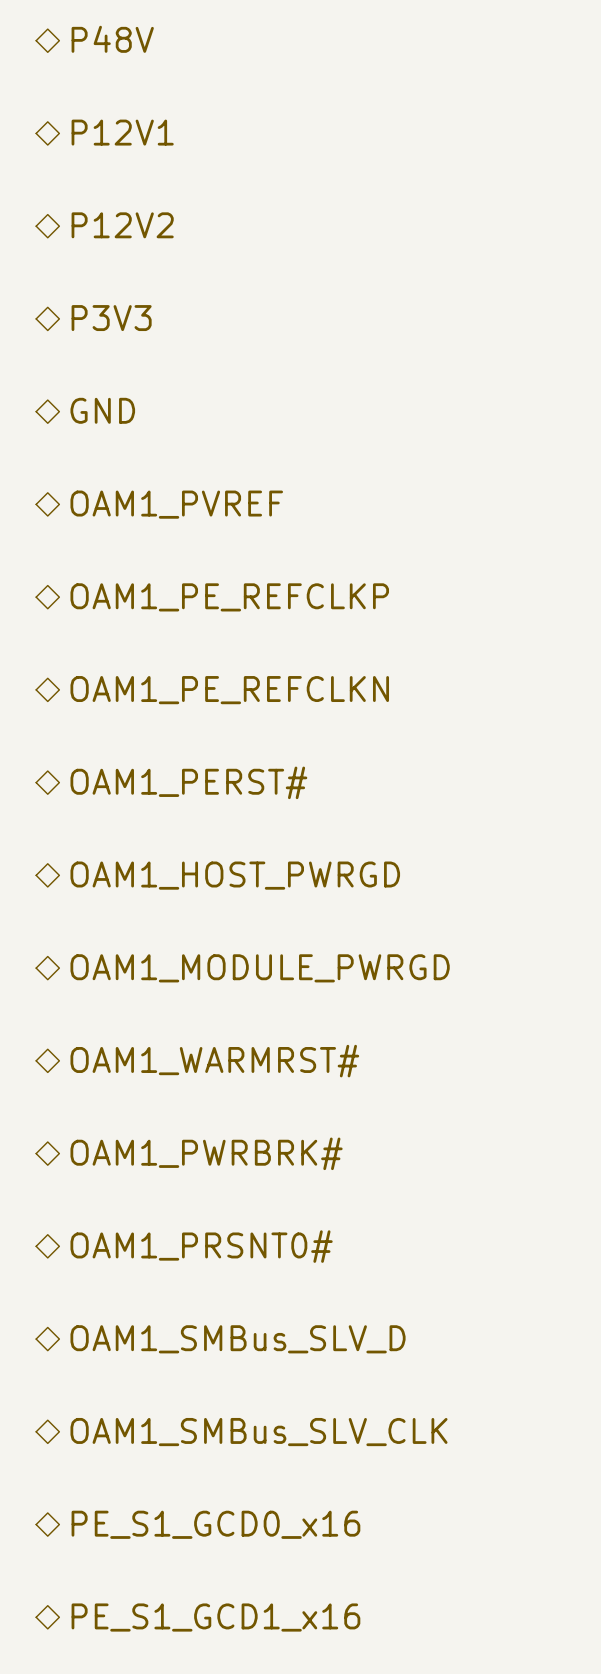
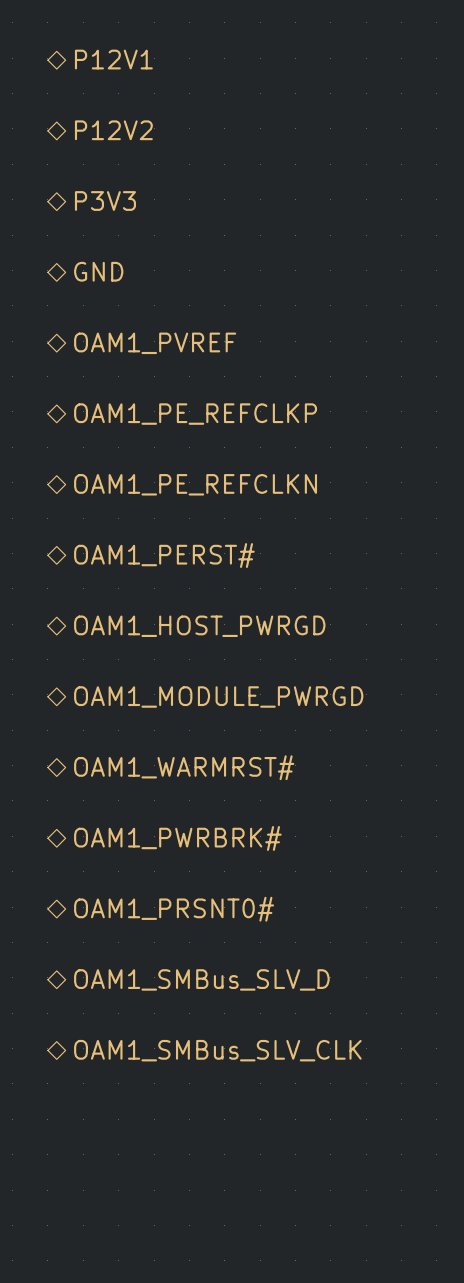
hierarchical label: PE_S1_GCD0_x16 (215, 1524) -> none
hierarchical label: PE_S1_GCD1_x16 (215, 1617) -> none

